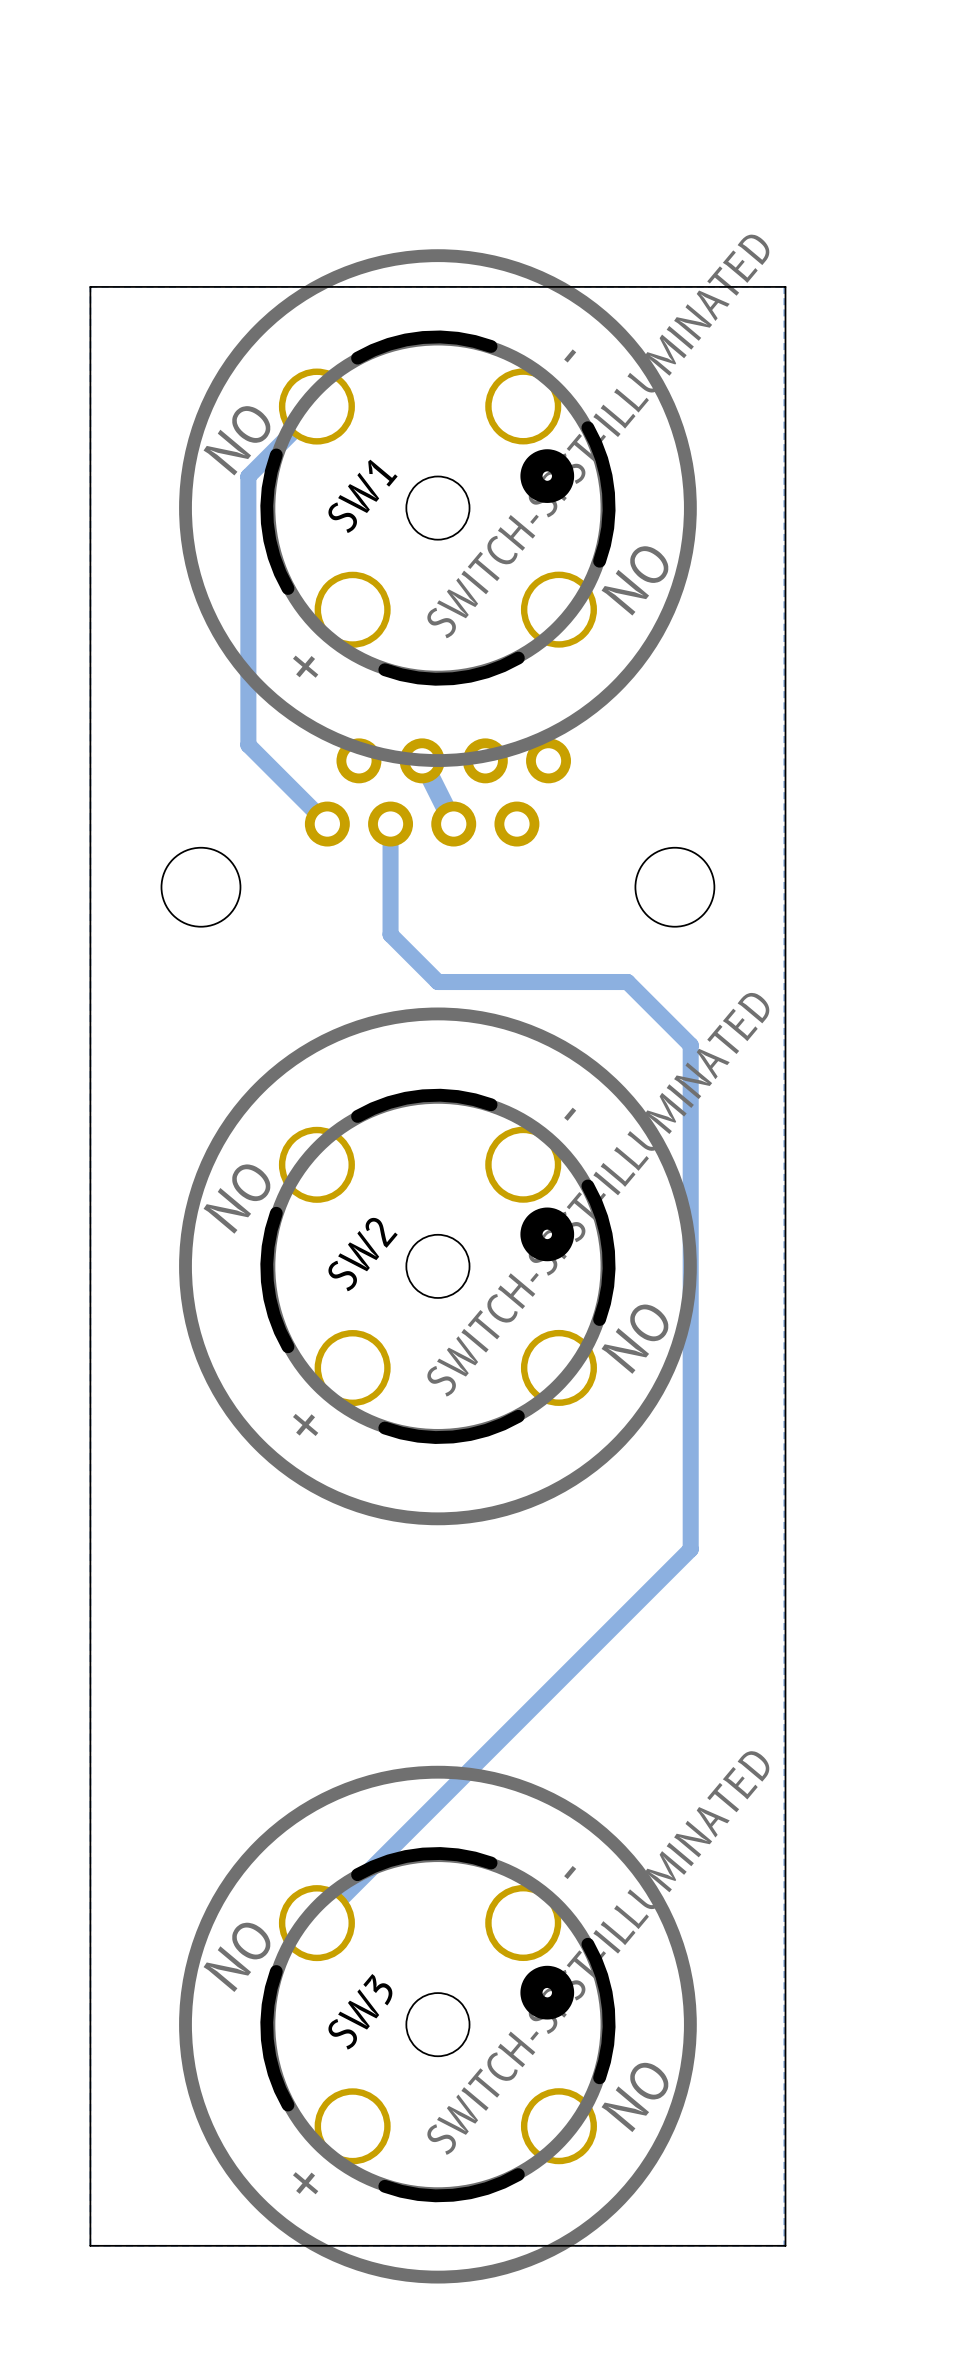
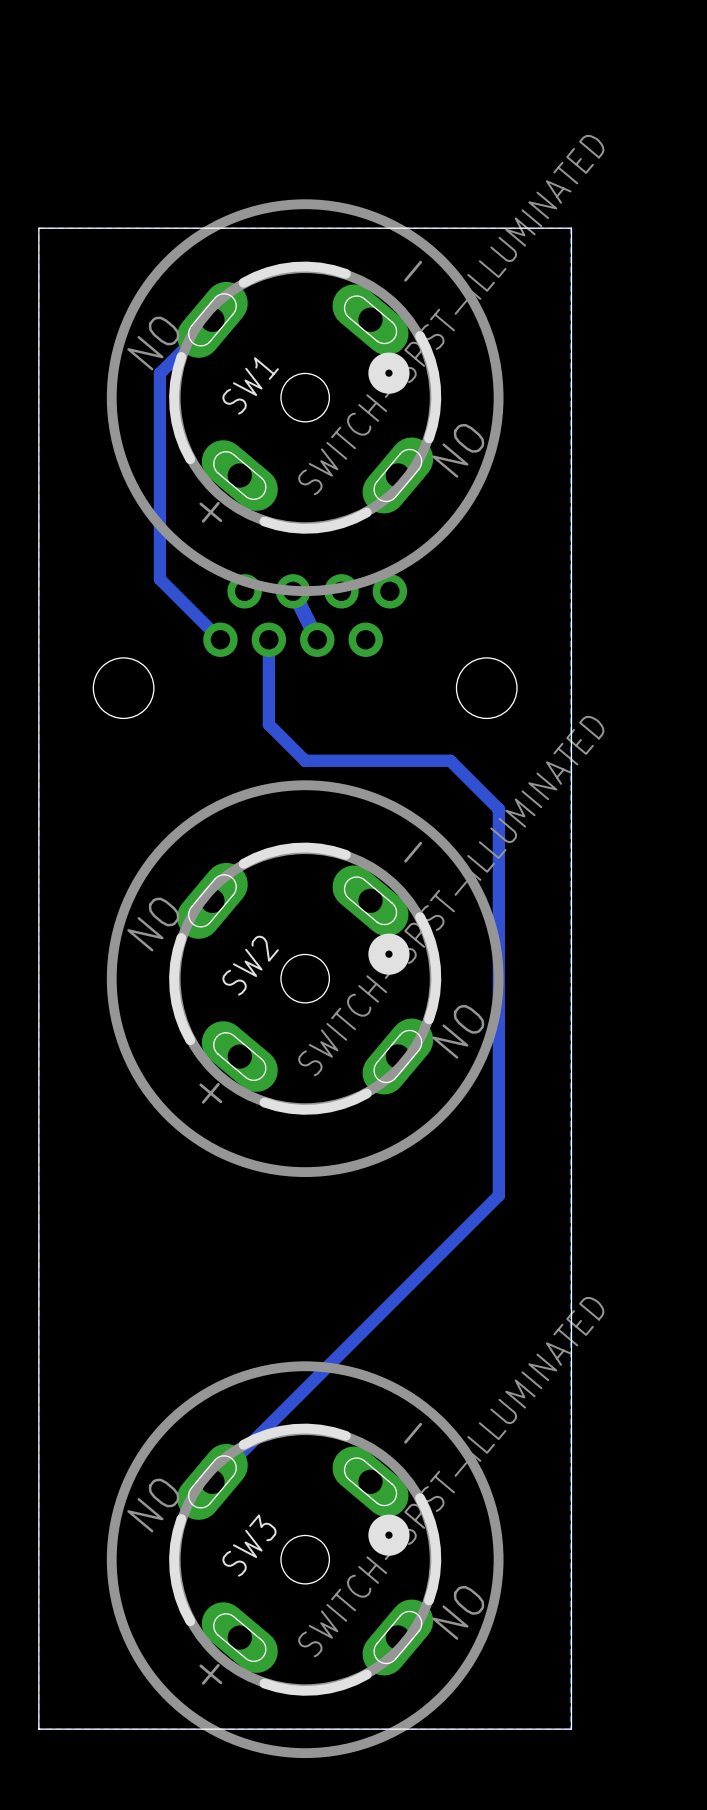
SW1 footprint: [179, 249, 697, 767] -> [106, 199, 504, 597]
SW2 footprint: [179, 1007, 697, 1526] -> [106, 780, 504, 1178]
SW3 footprint: [179, 1765, 697, 2284] -> [106, 1361, 504, 1759]

